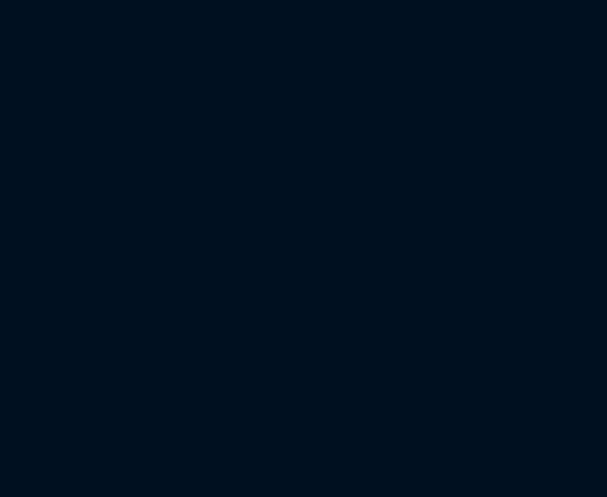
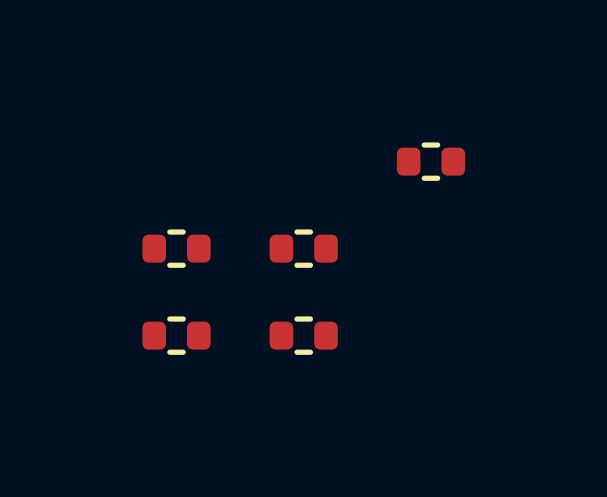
part: none -> (430, 161)
part: none -> (176, 248)
part: none -> (303, 248)
part: none -> (176, 335)
part: none -> (303, 335)

